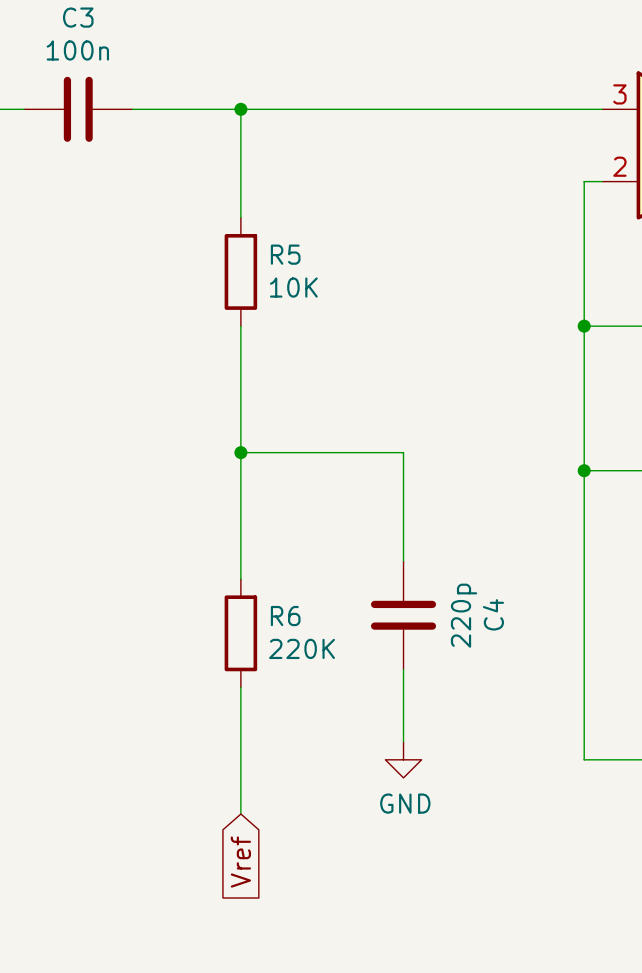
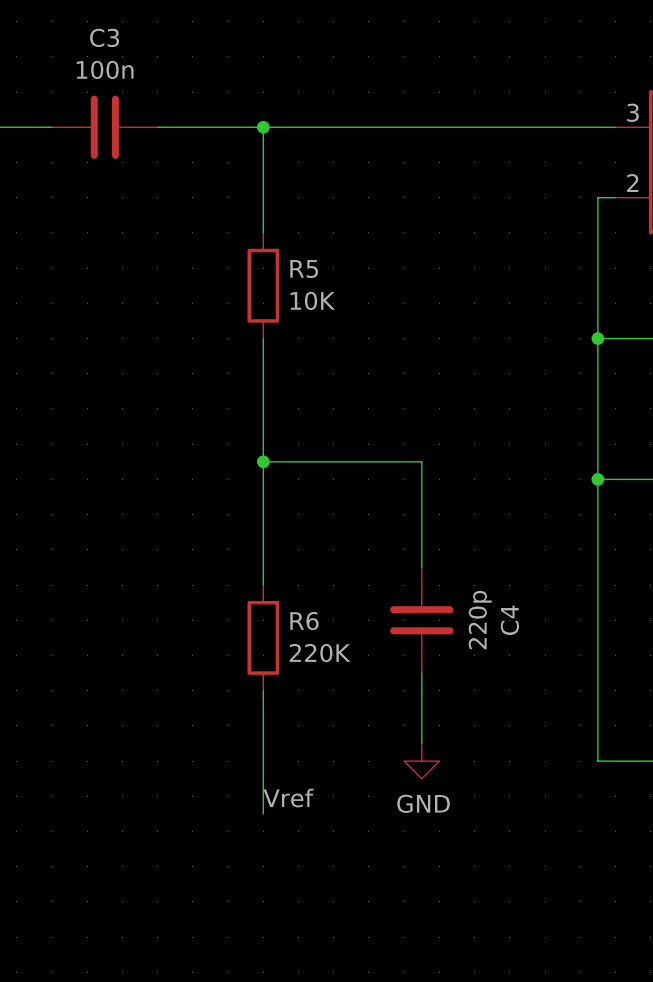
label: none -> Vref (288, 798)
global label: Vref (240, 862) -> none

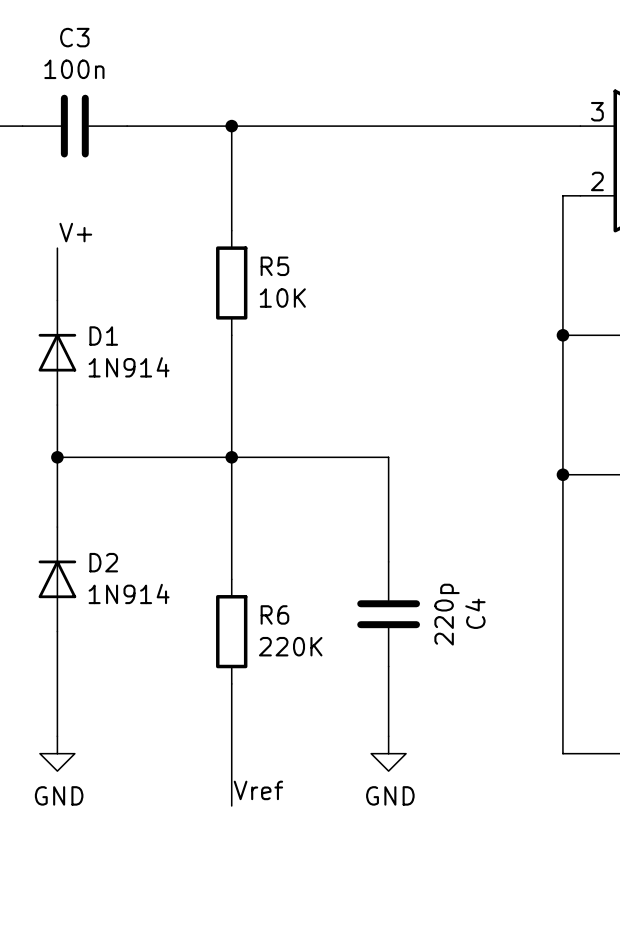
label: none -> V+ (75, 232)
wire: none -> (57, 248) (57, 300)
D1: none -> 1N914 (57, 352)
wire: none -> (57, 405) (57, 527)
wire: none -> (57, 457) (231, 457)
junction: none -> (57, 457)
D2: none -> 1N914 (57, 579)
wire: none -> (57, 631) (57, 736)
power symbol: none -> GND (57, 753)

